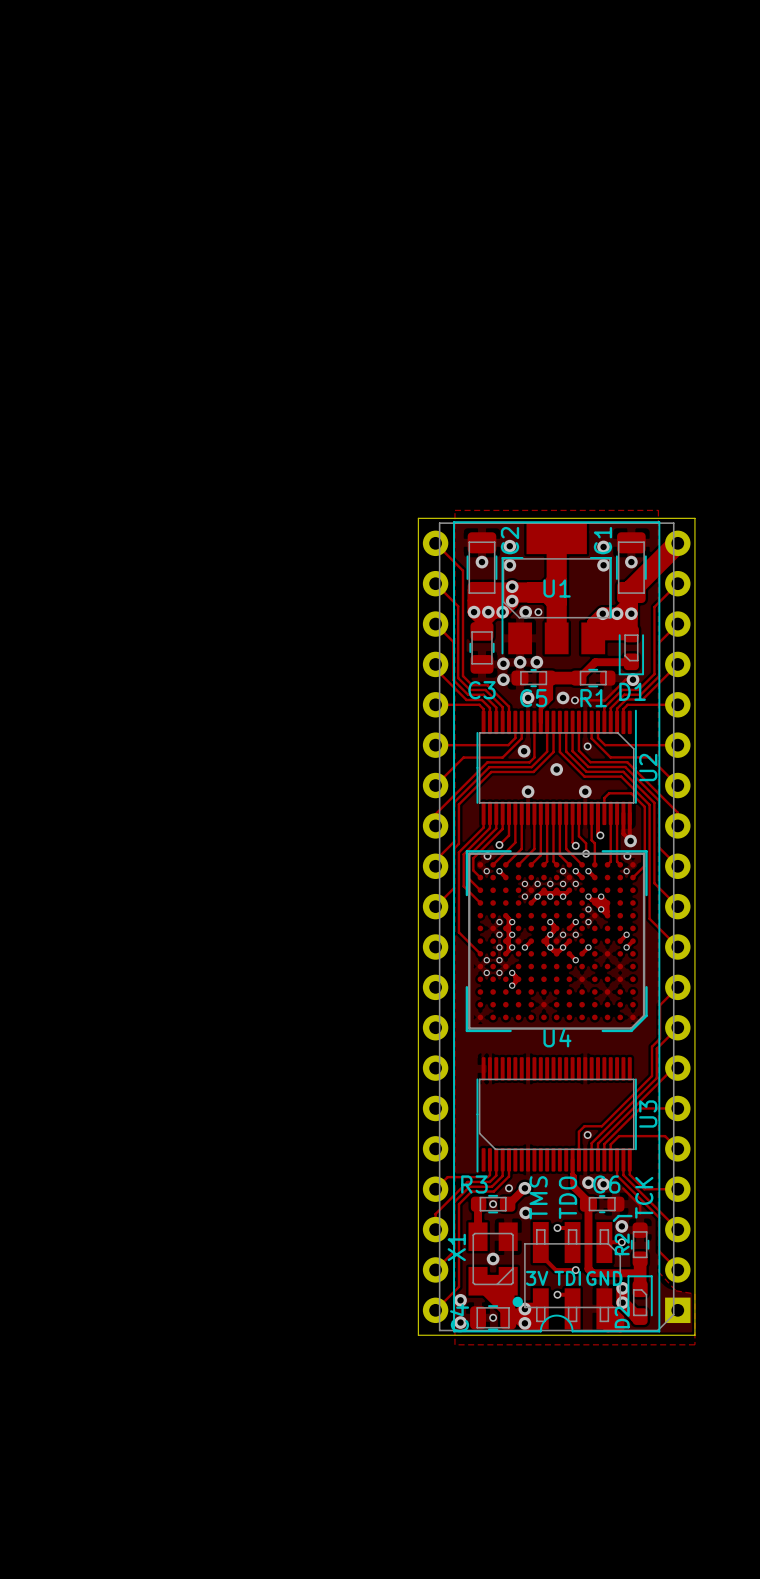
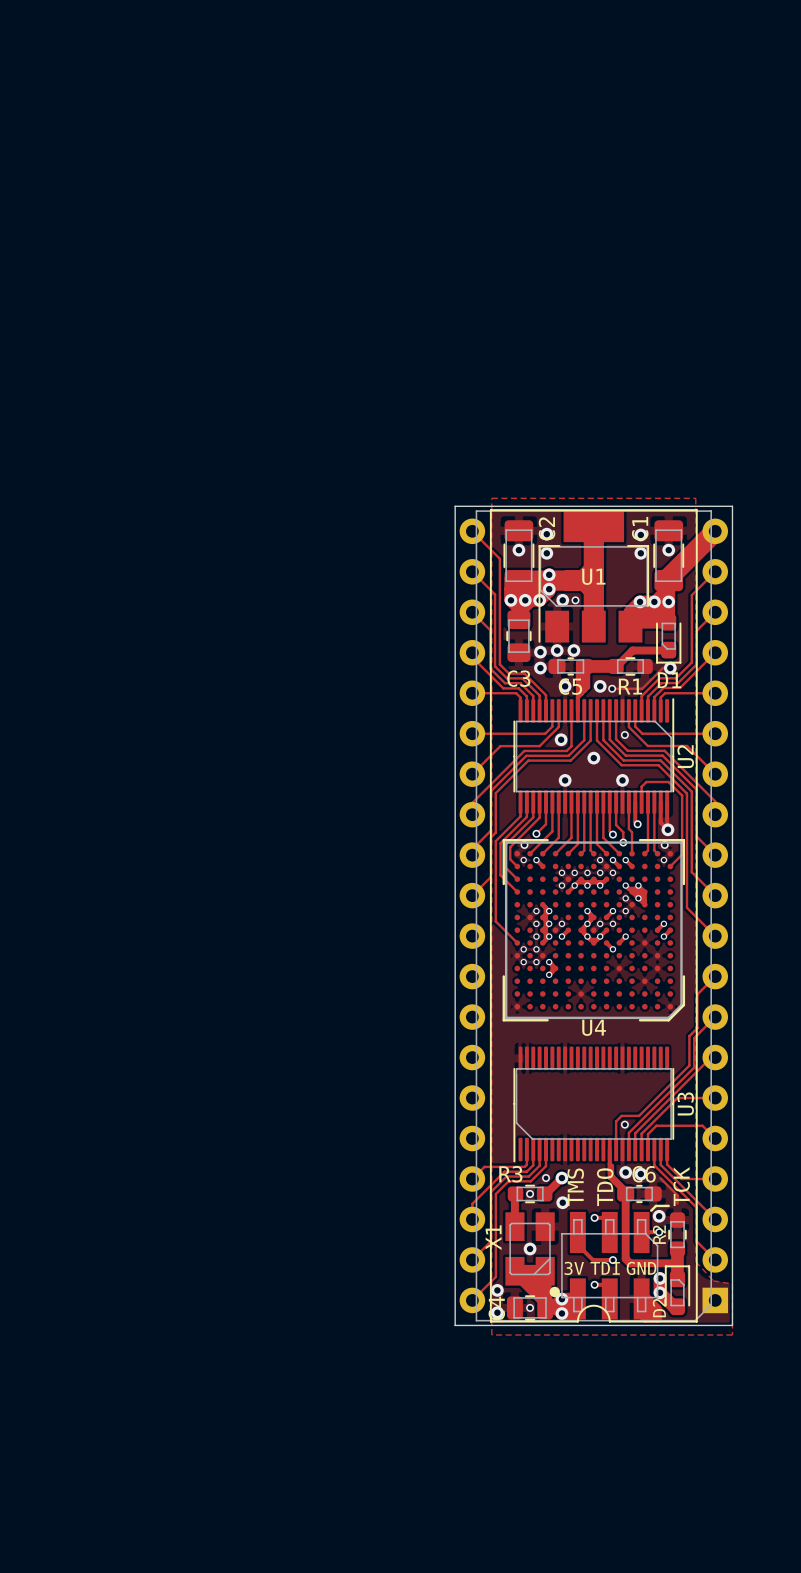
via: none -> (561, 923)

